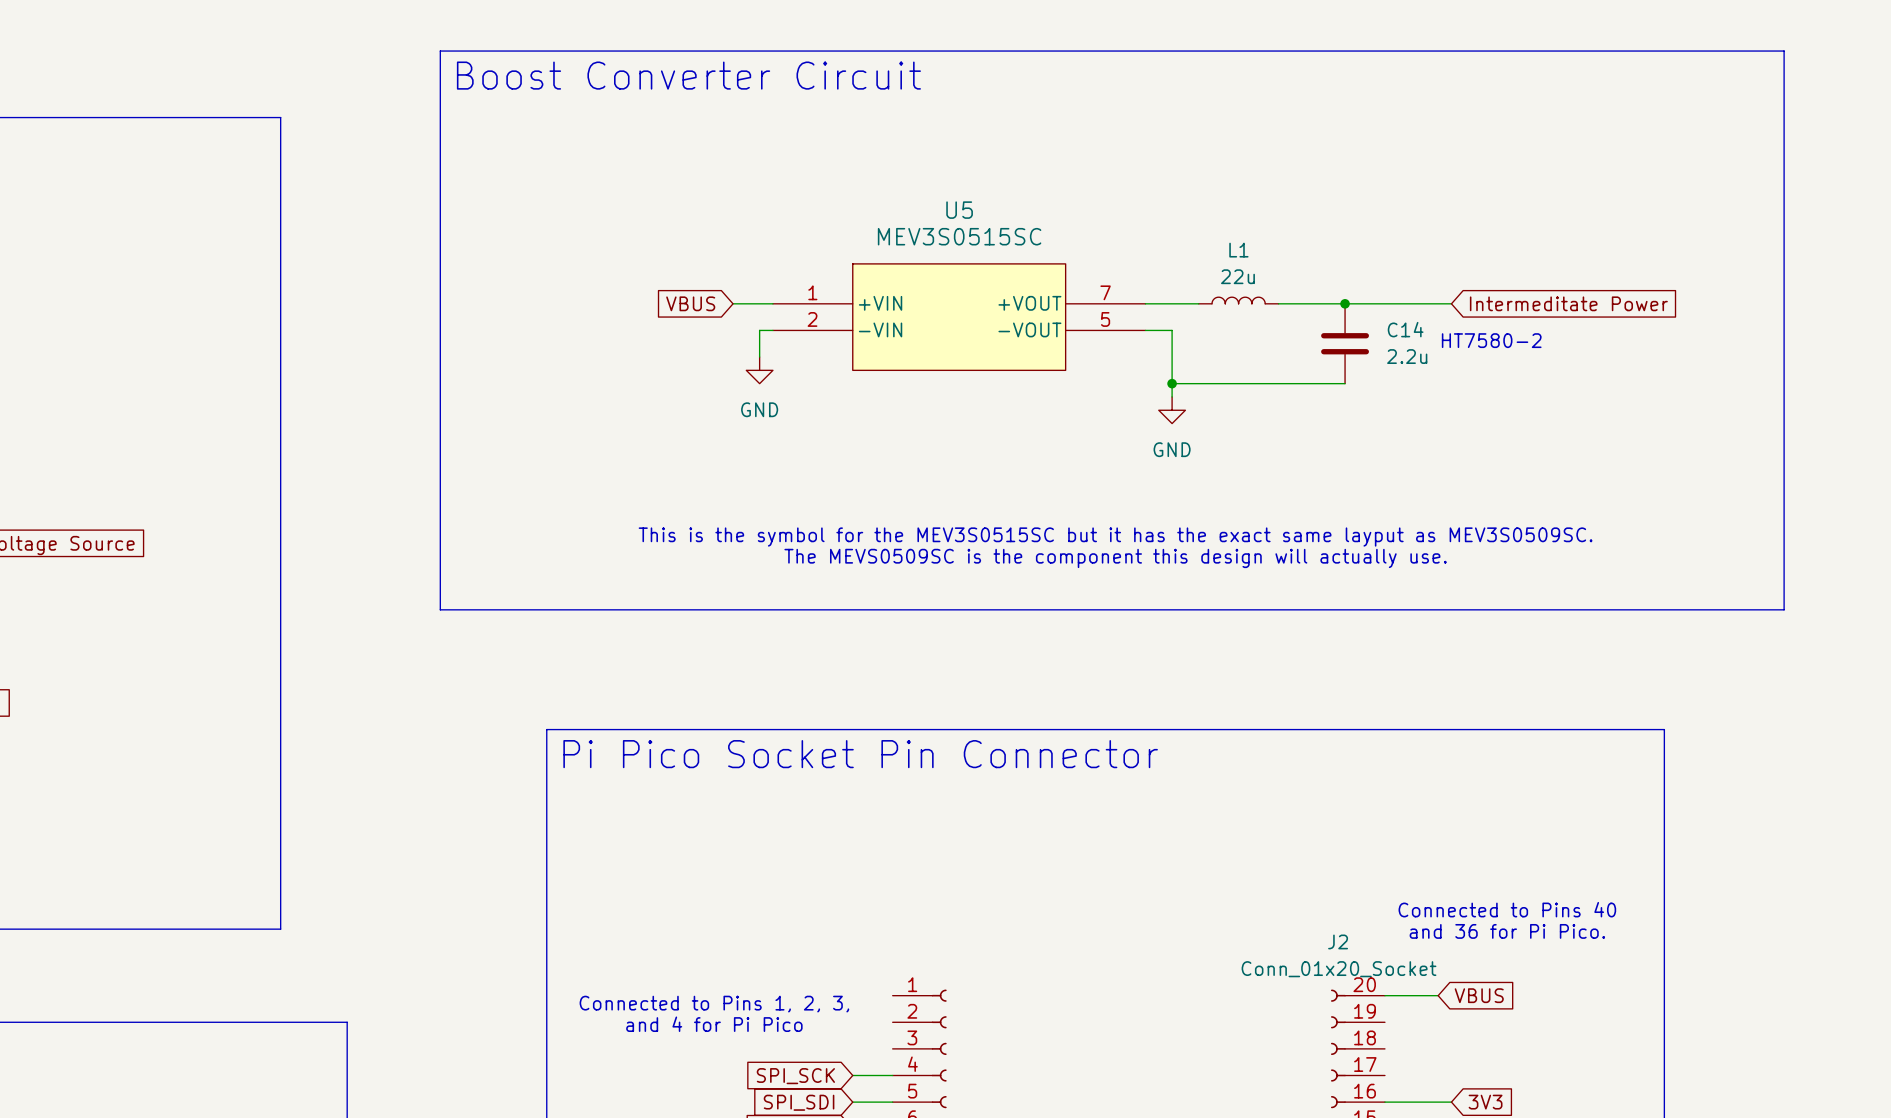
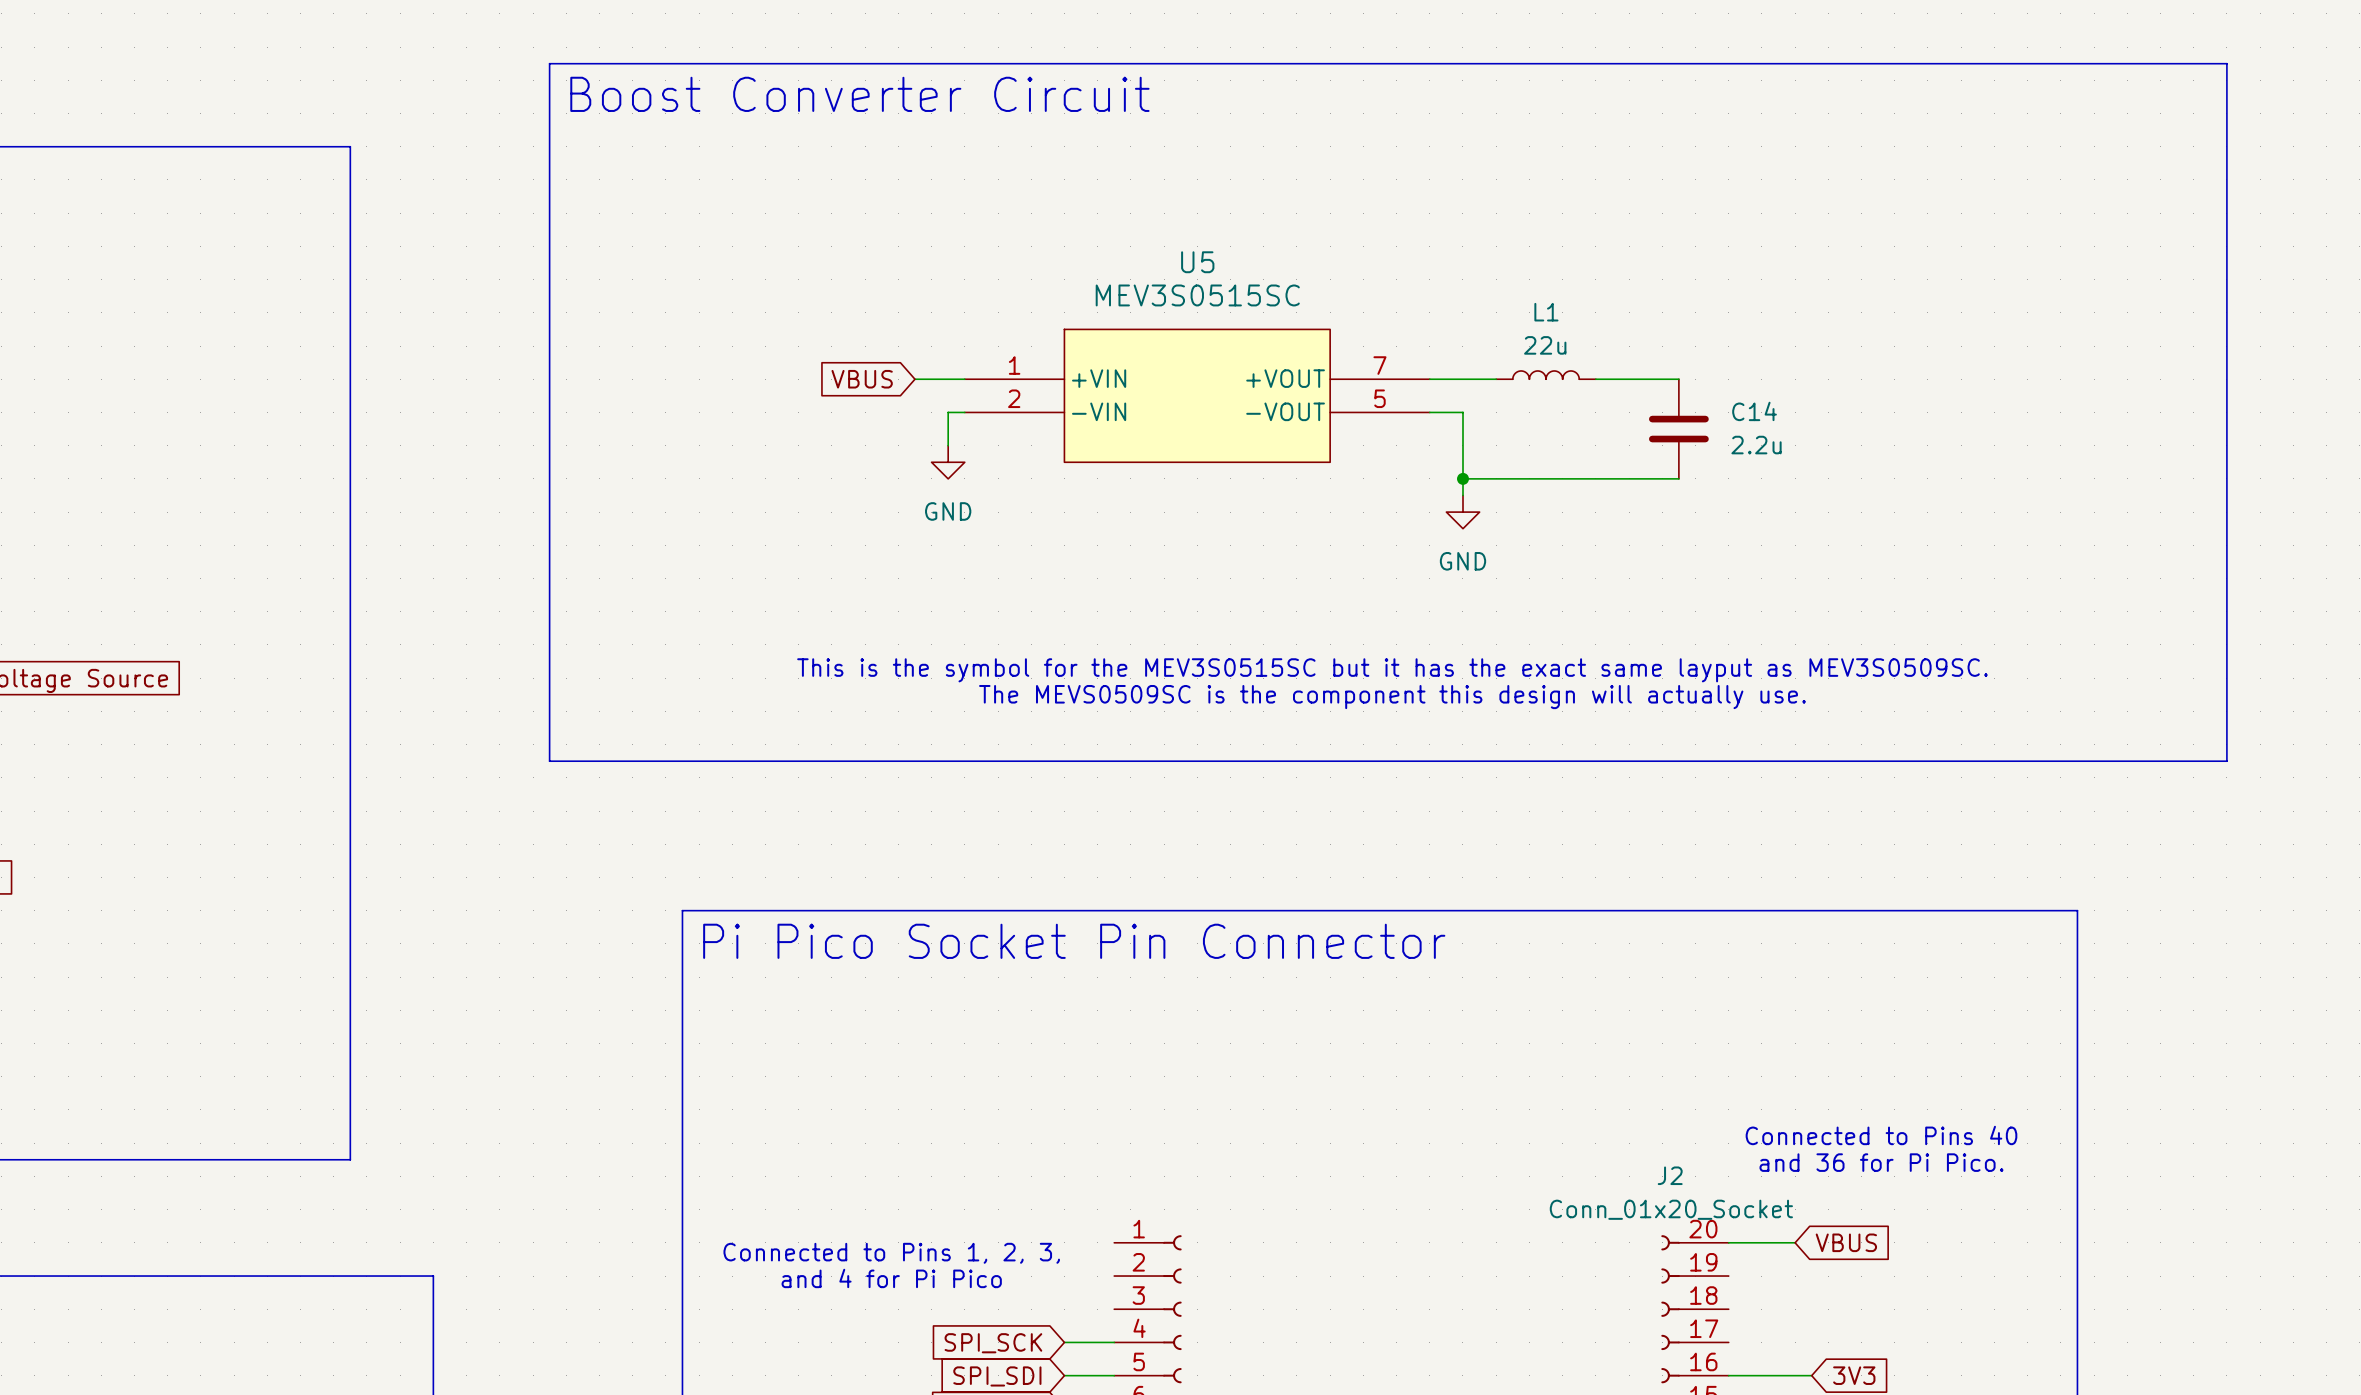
wire: (1345, 303) (1451, 303) -> none
junction: (1345, 303) -> none
global label: Intermeditate Power (1568, 303) -> none
text: HT7580-2 (1491, 340) -> none

